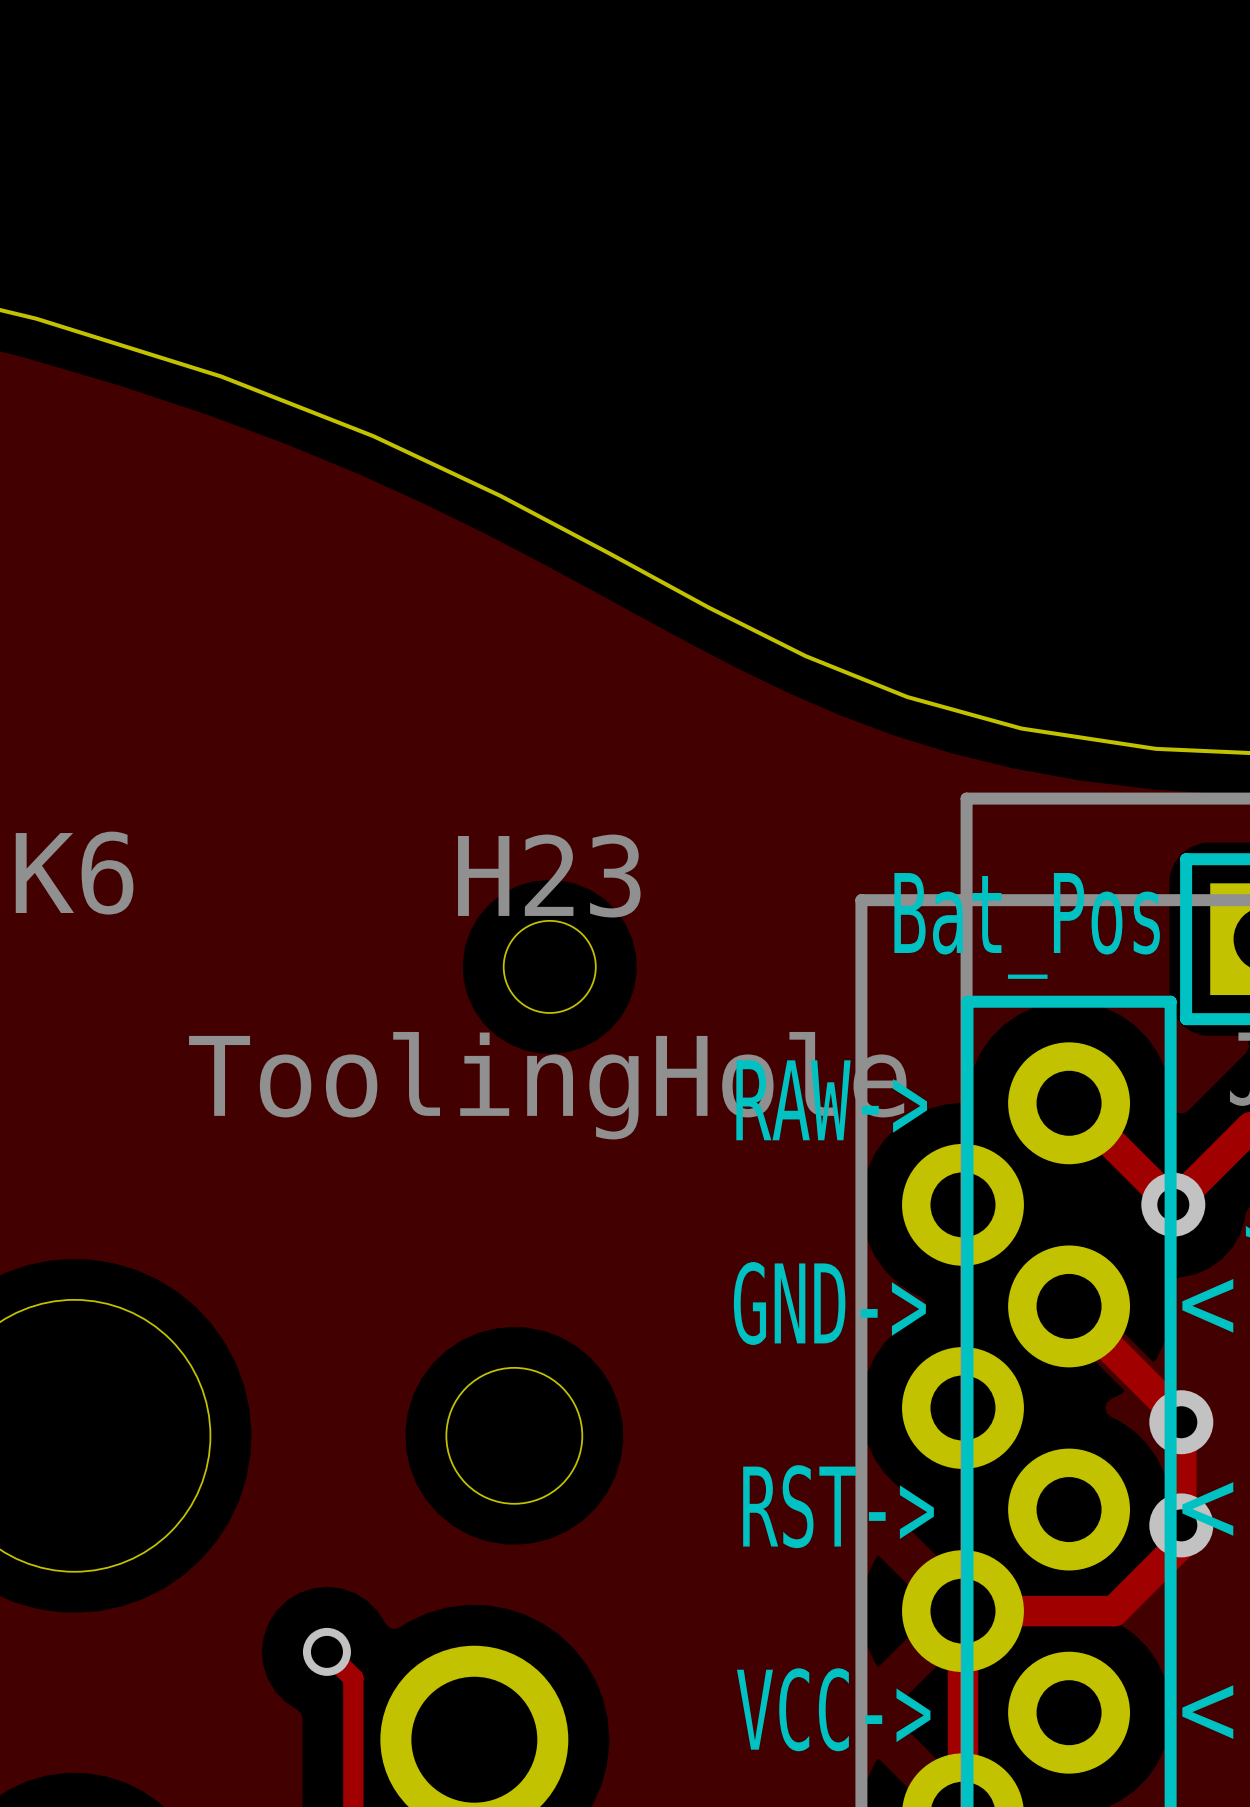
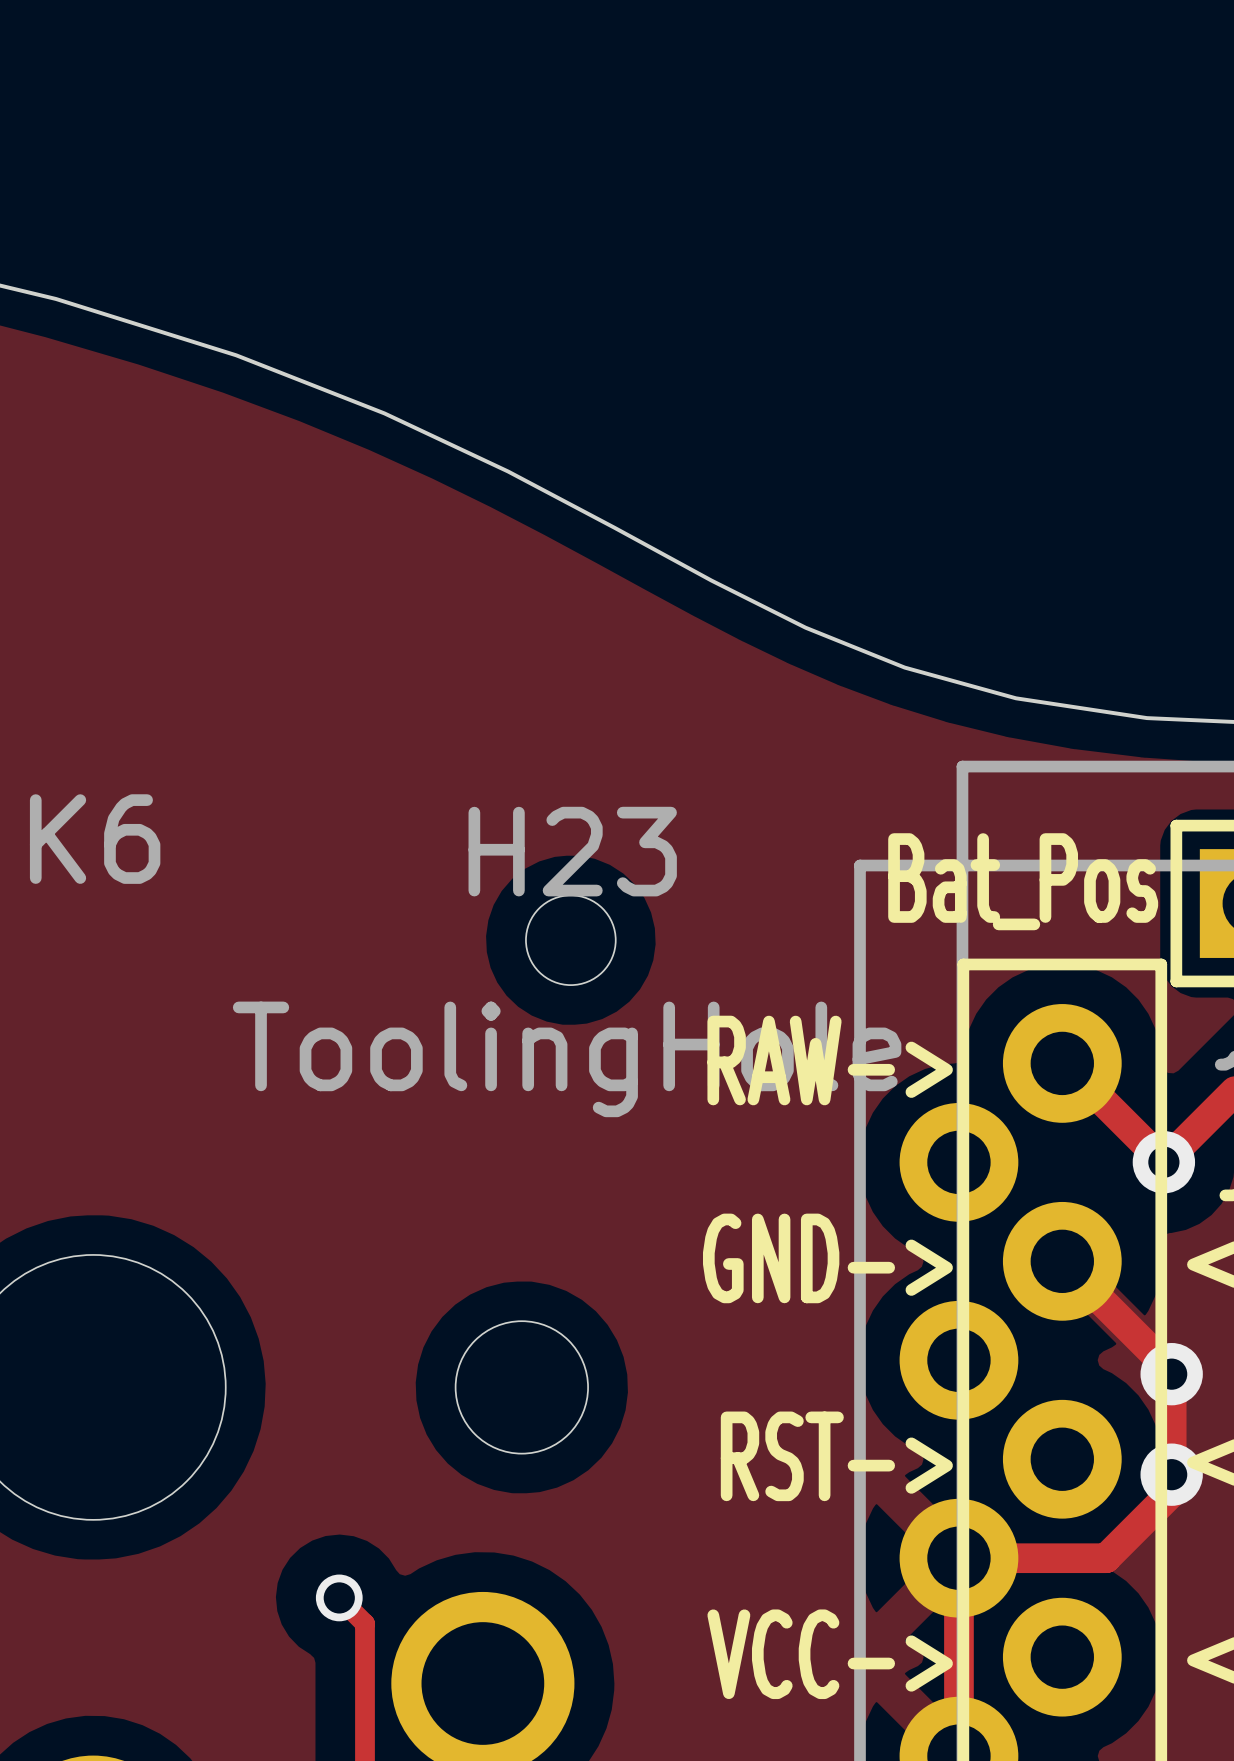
H23 position: (549, 966) -> (570, 940)

